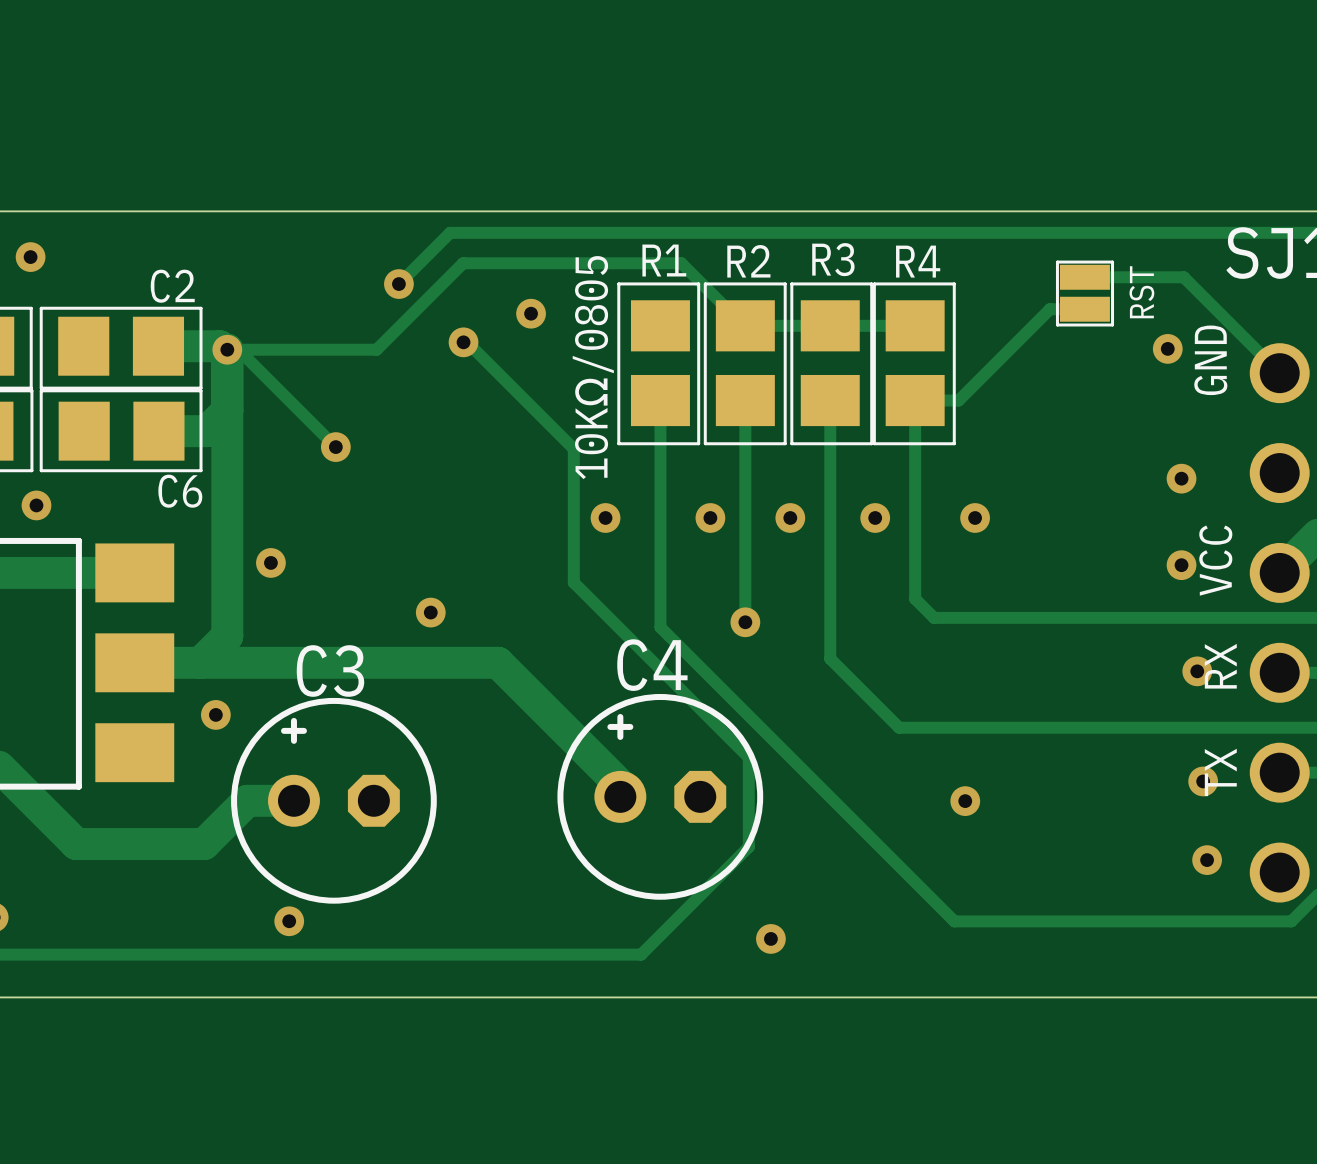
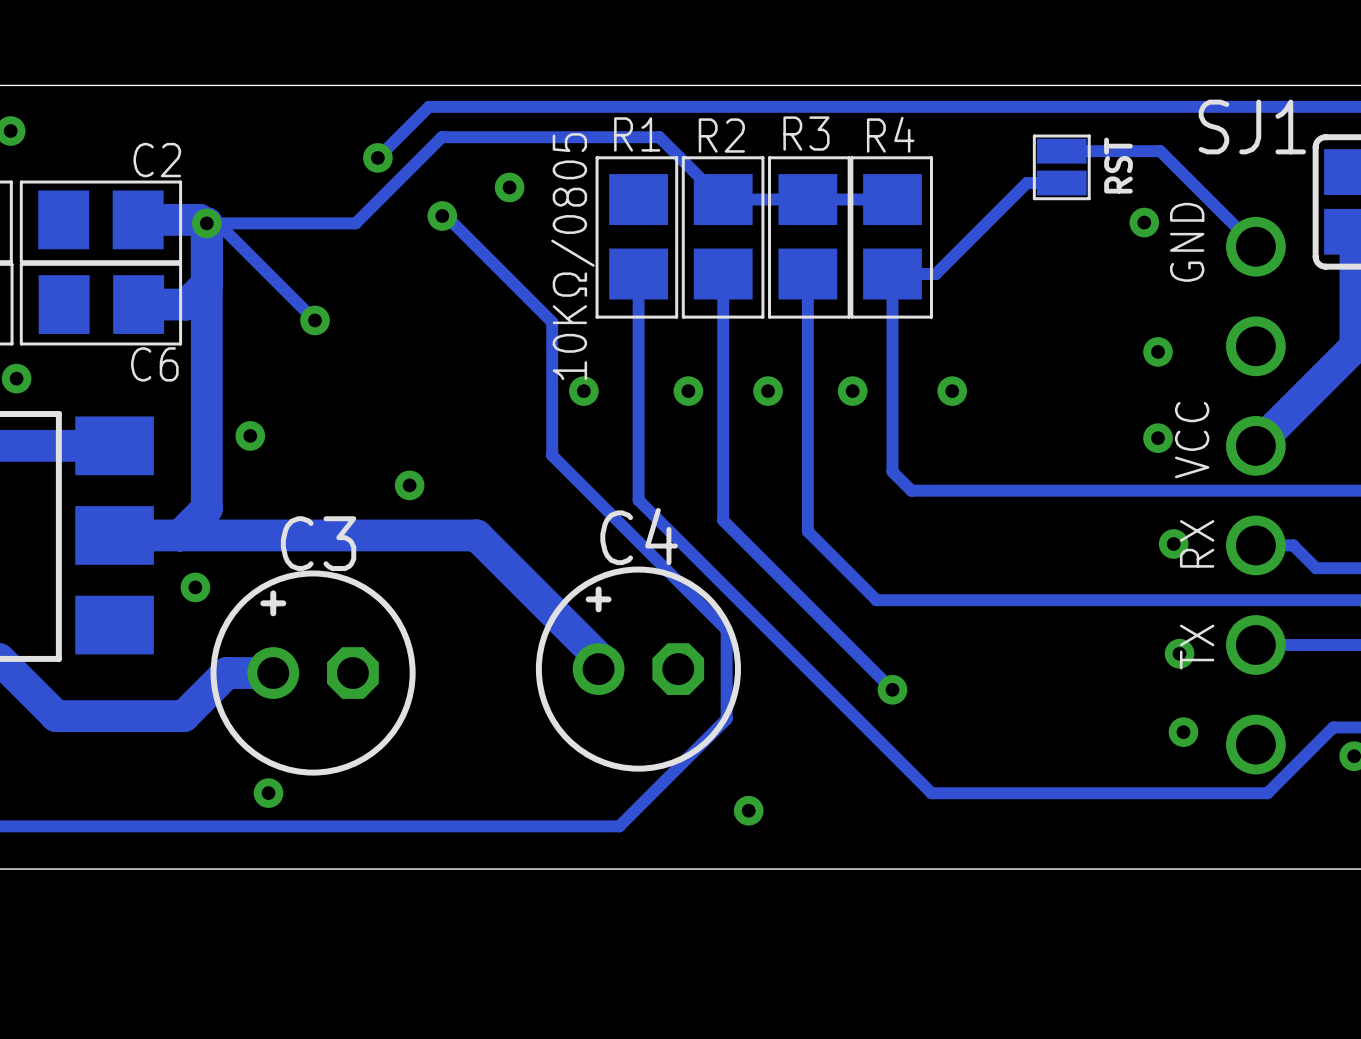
track: none -> (723, 495) (723, 520) (892, 689)
via: (745, 622) -> none
via position: (965, 801) -> (892, 689)

